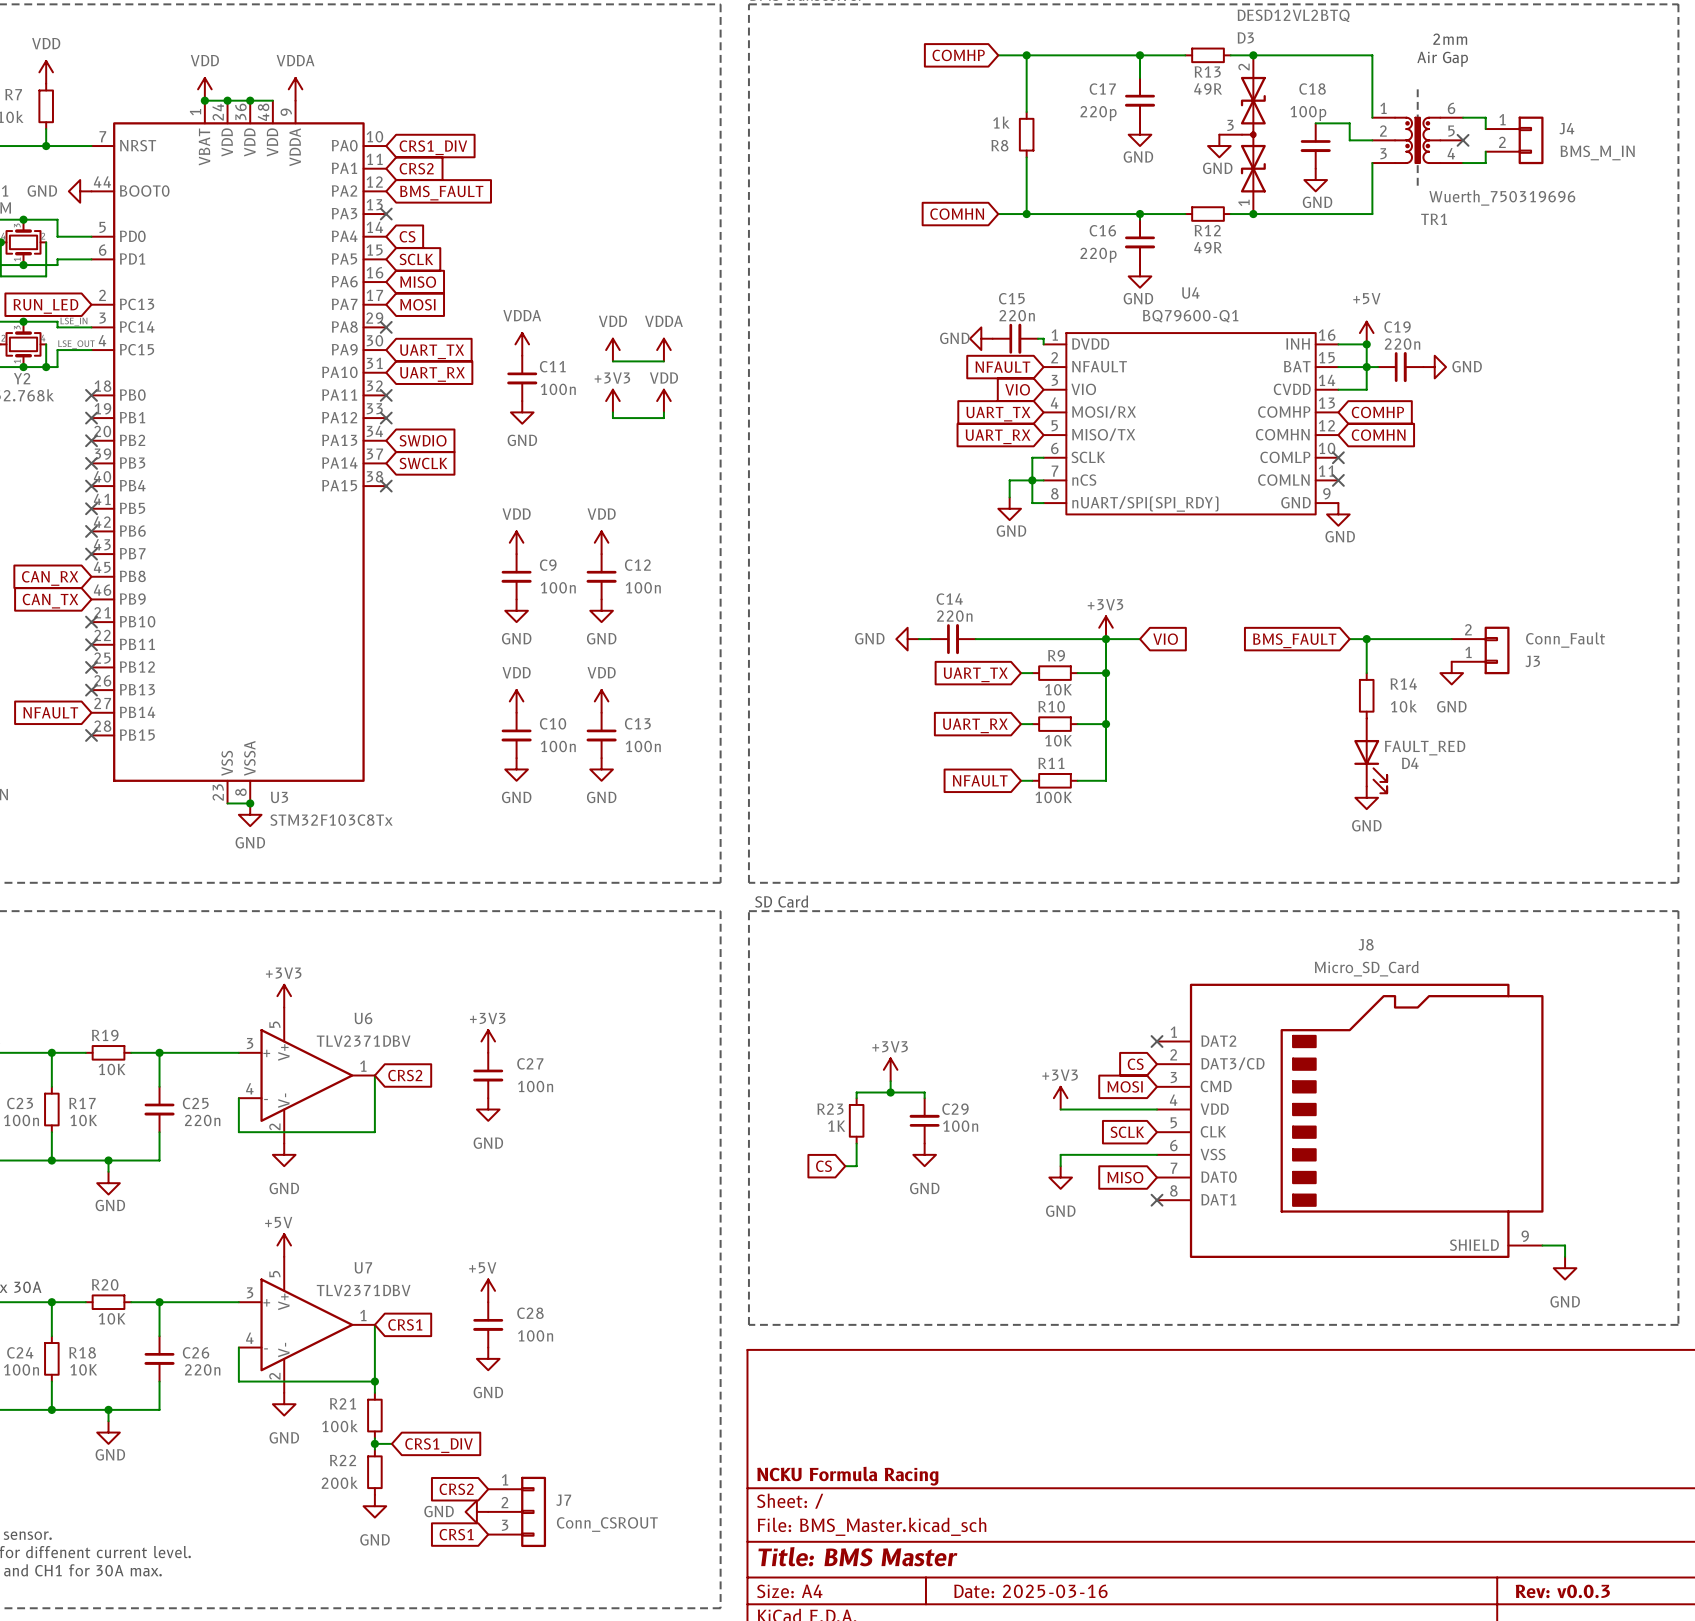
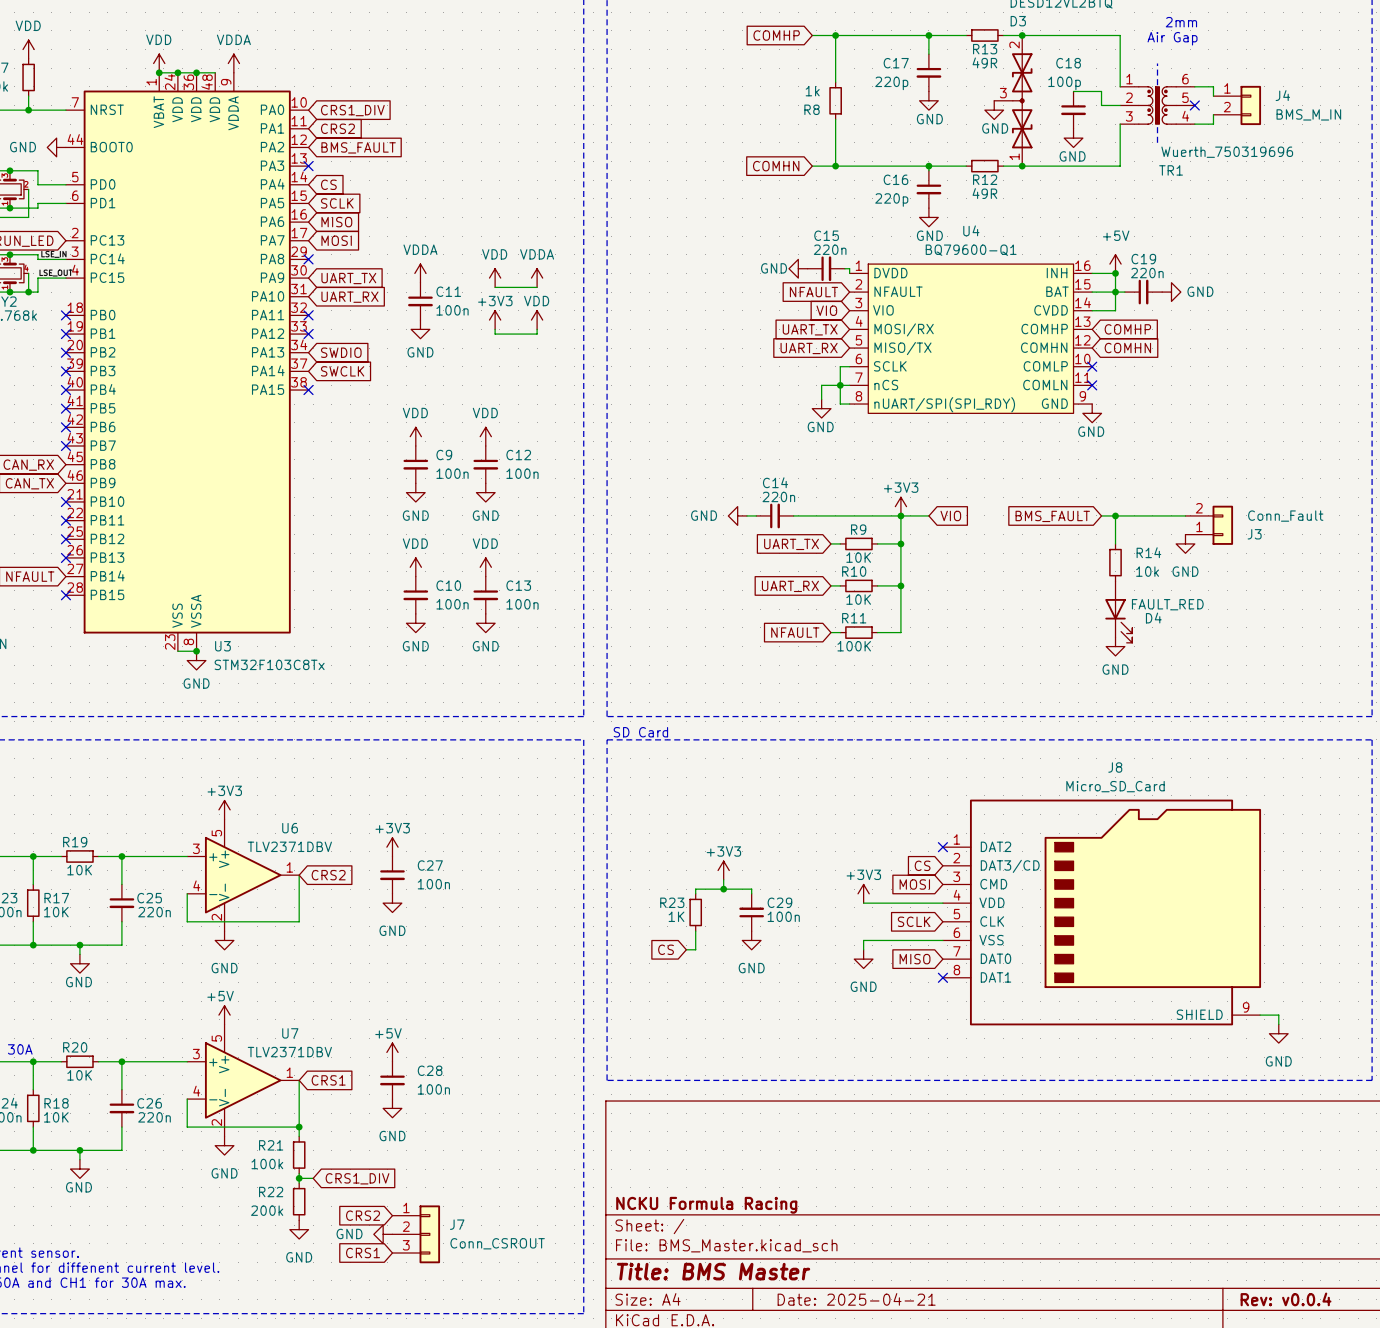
title block: Date: 2025-03-16 (1030, 1591) -> Date: 2025-04-21 (856, 1299)
title block: Rev: v0.0.3 (1562, 1591) -> Rev: v0.0.4 (1286, 1299)

